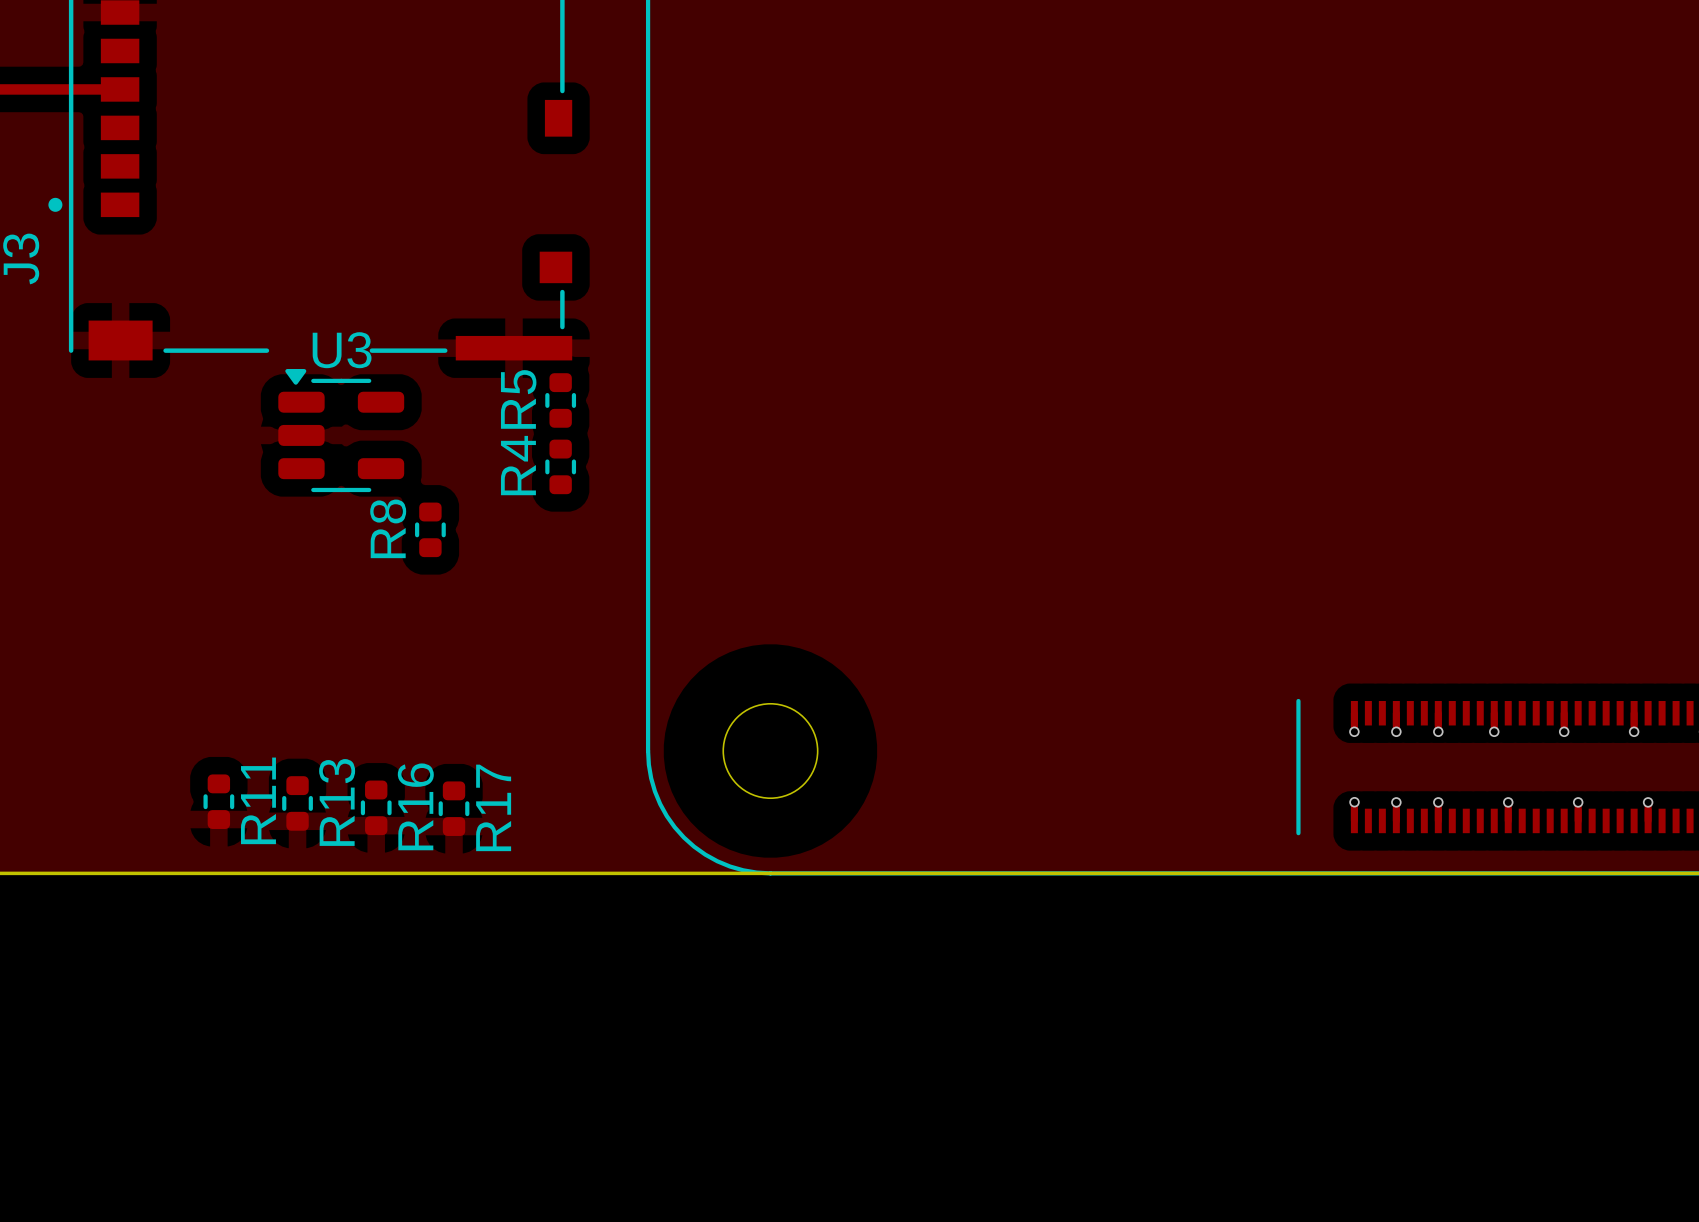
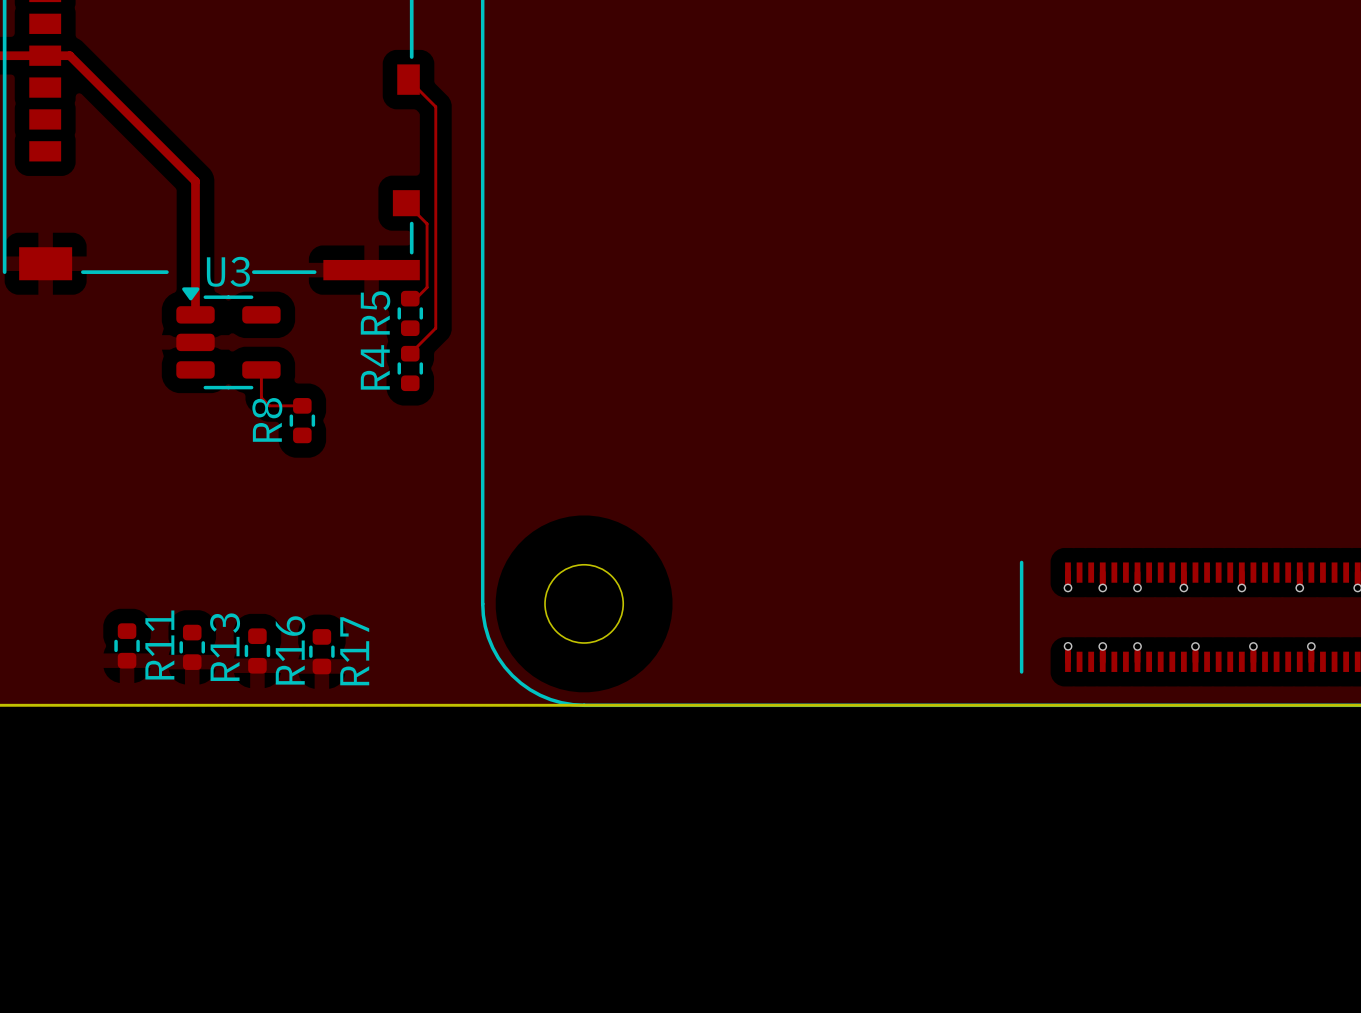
track: none -> (45, 55) (69, 55) (195, 181) (195, 314)
track: none -> (408, 79) (435, 106) (435, 328) (410, 353)
track: none -> (406, 203) (427, 223) (427, 287) (415, 298) (410, 298)
track: none -> (261, 369) (261, 397) (269, 405) (302, 405)

